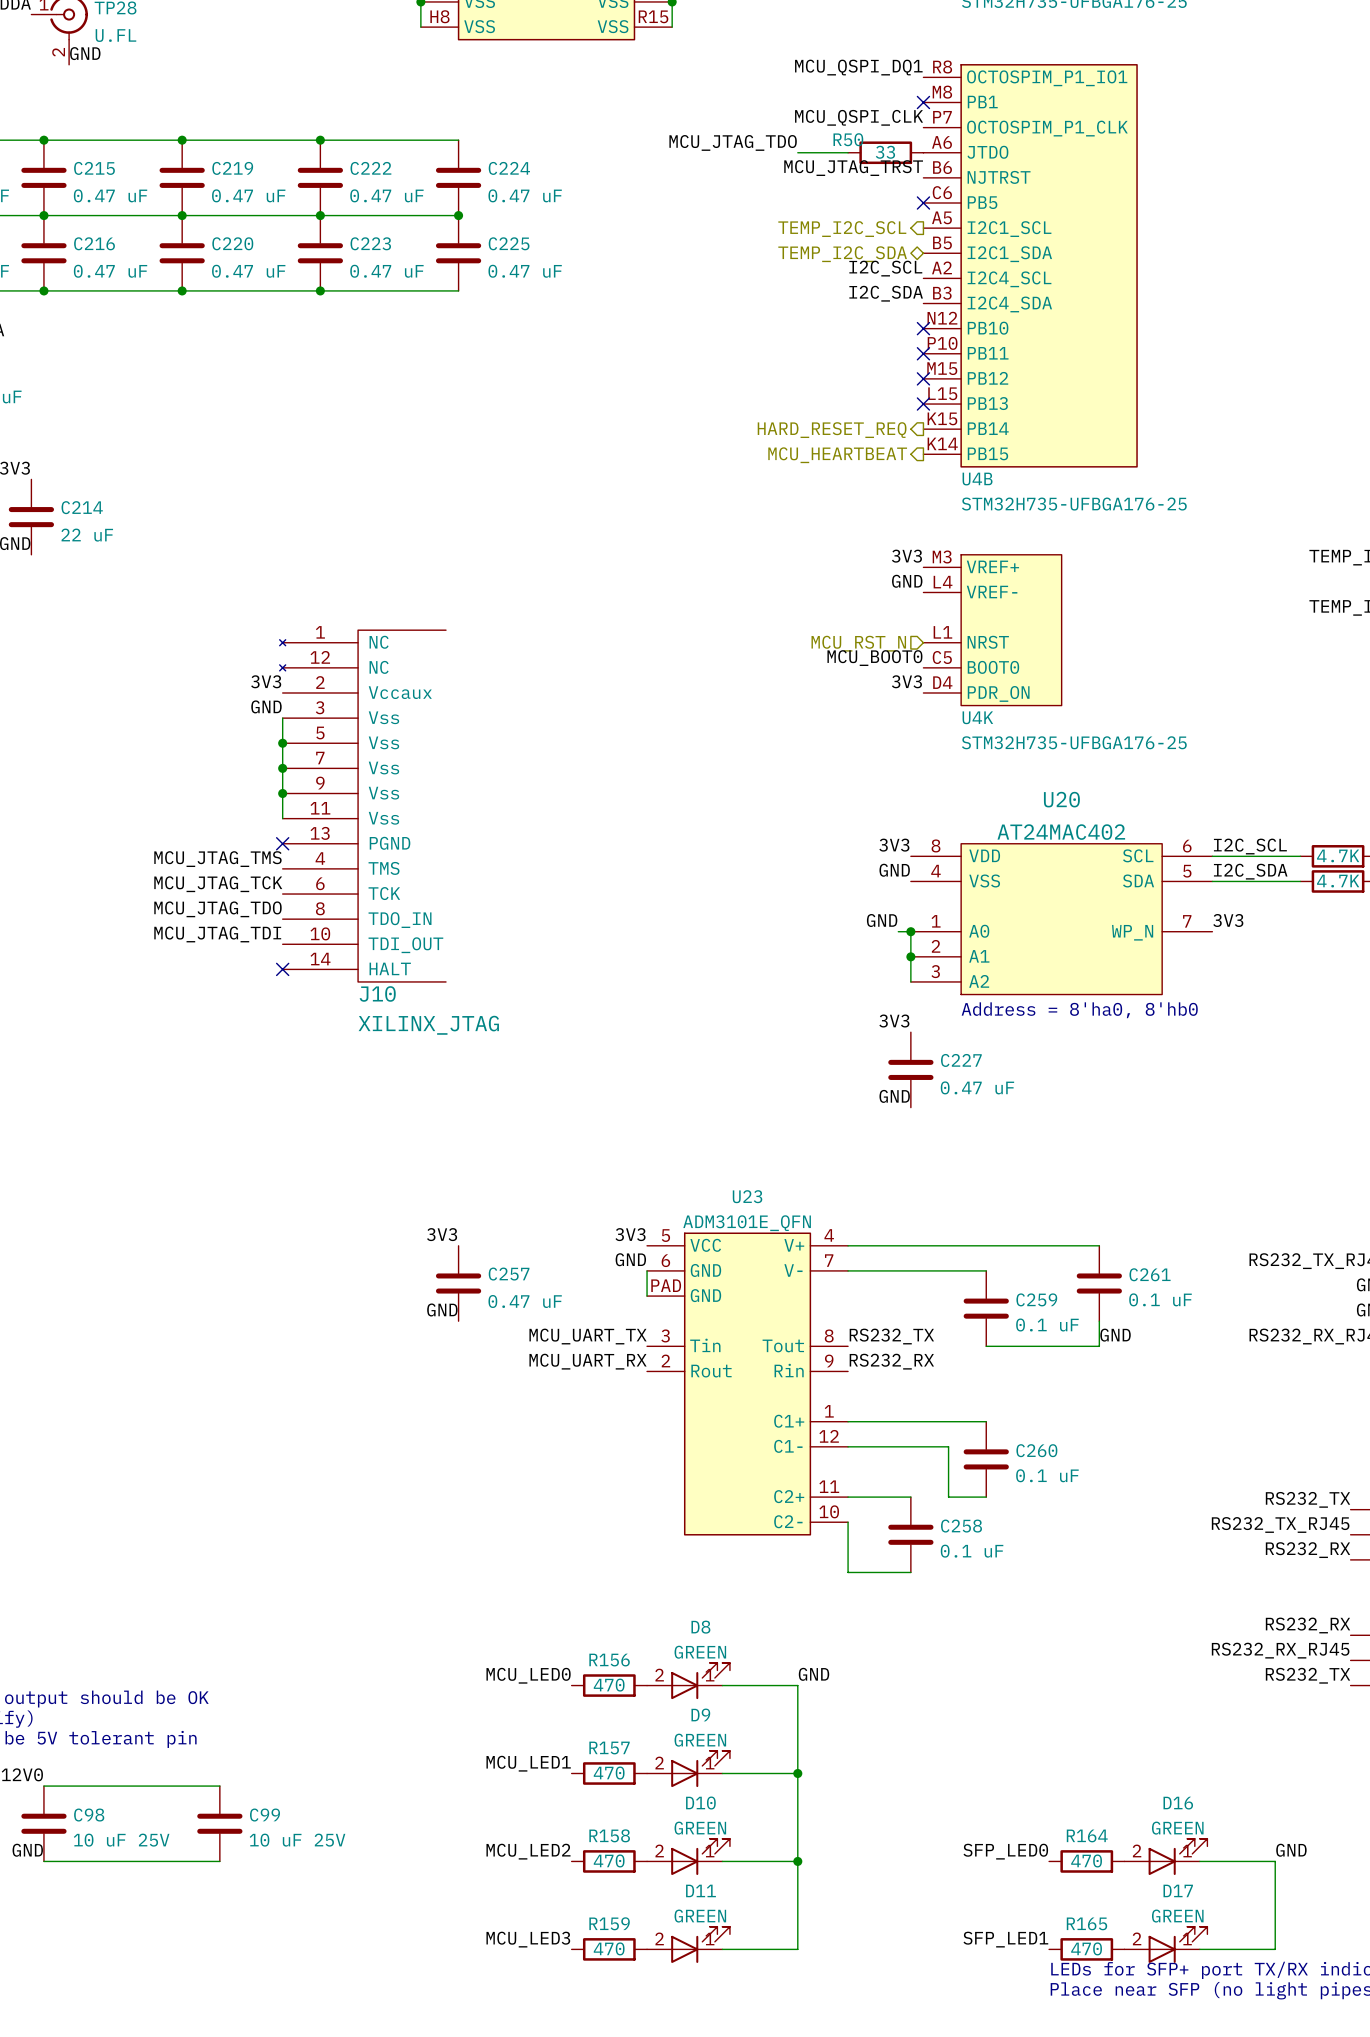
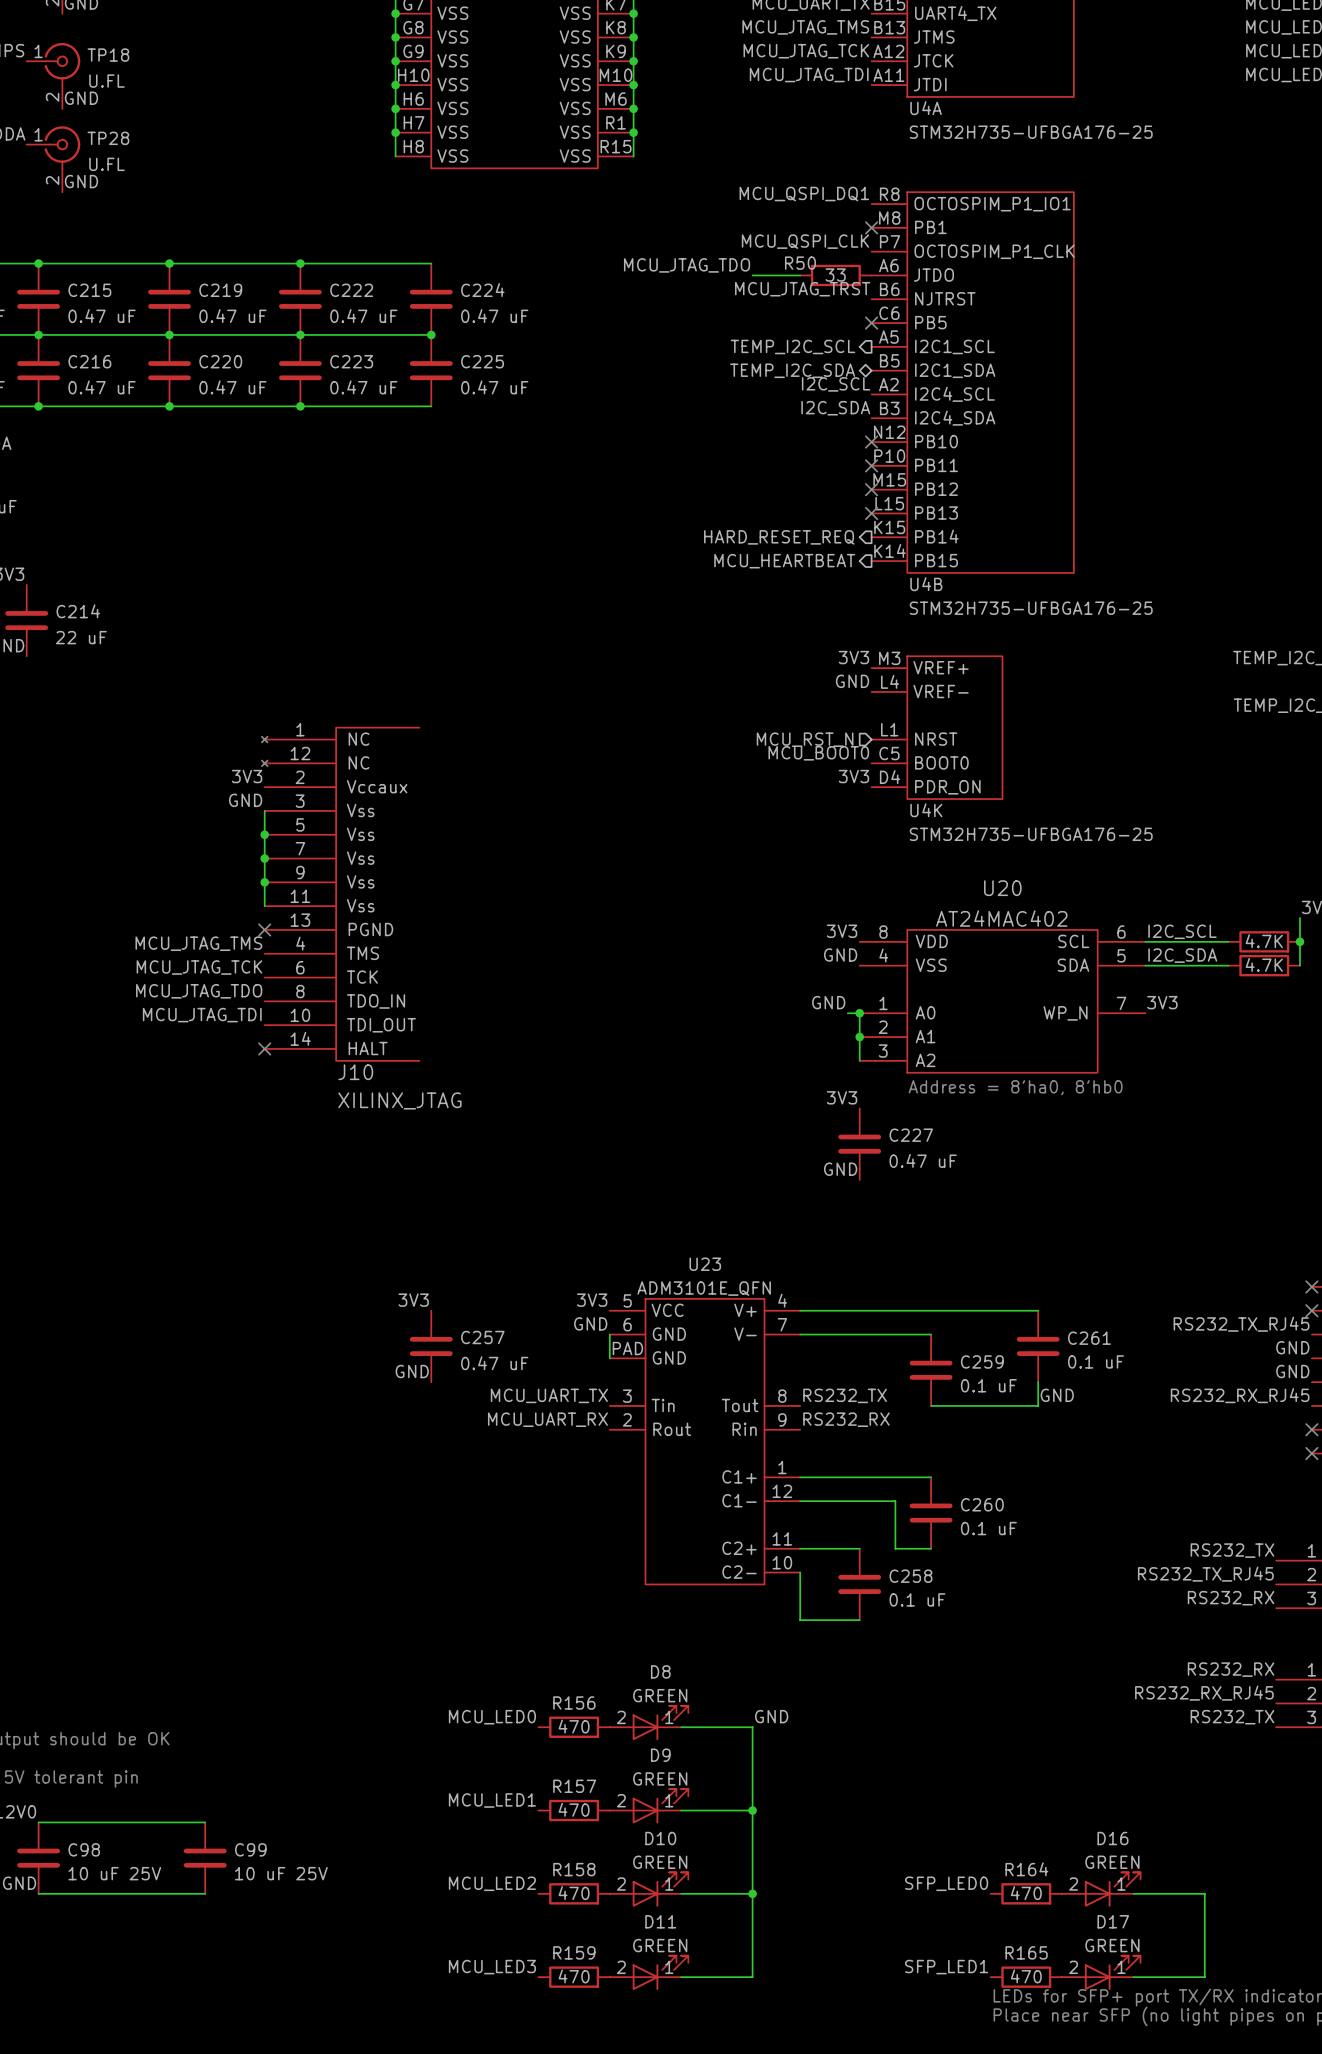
label: GND (1291, 1850) -> none

